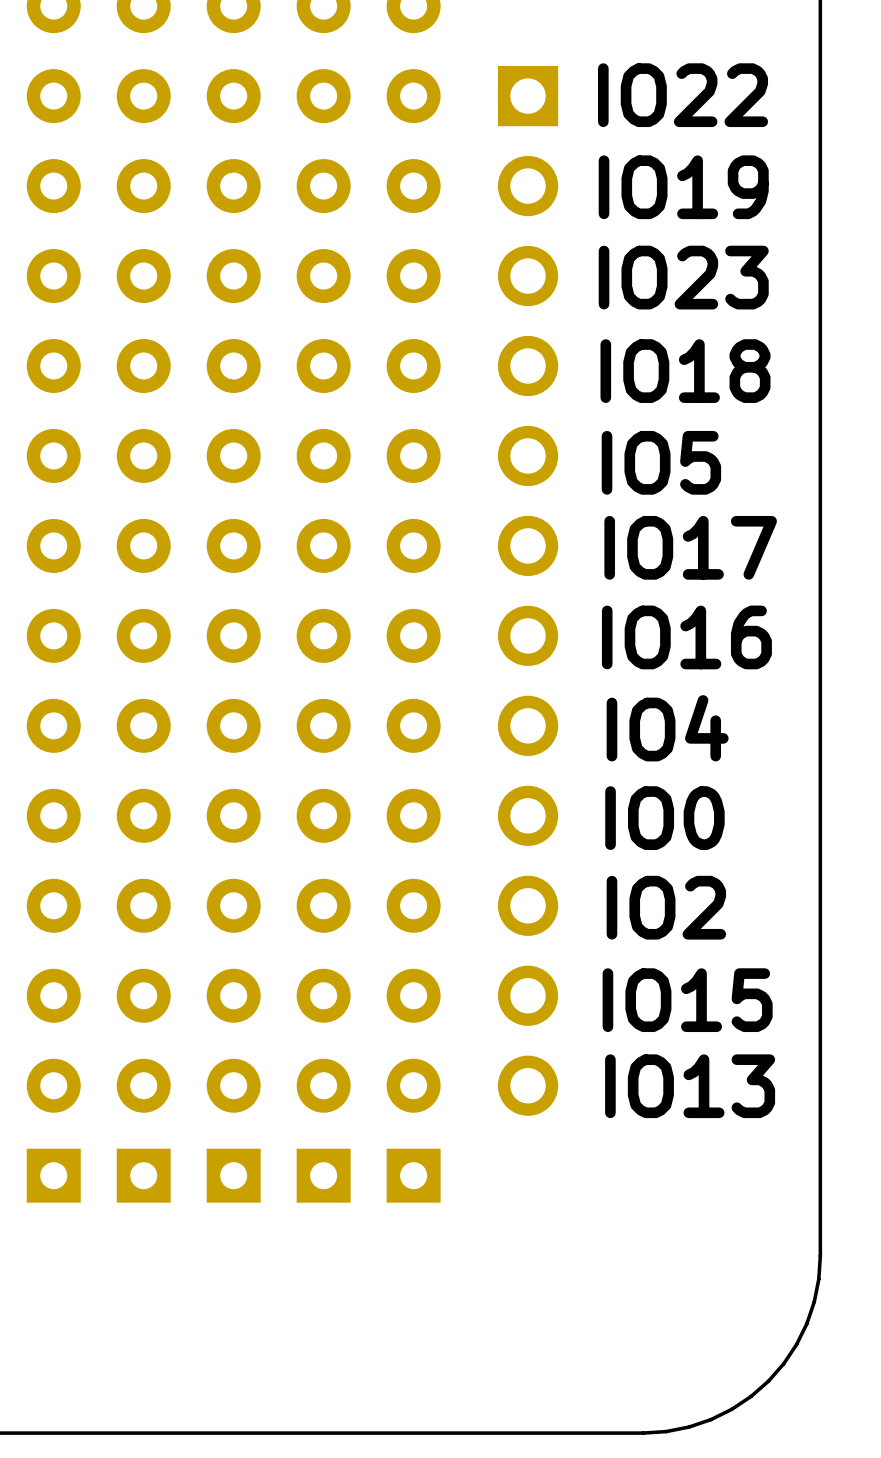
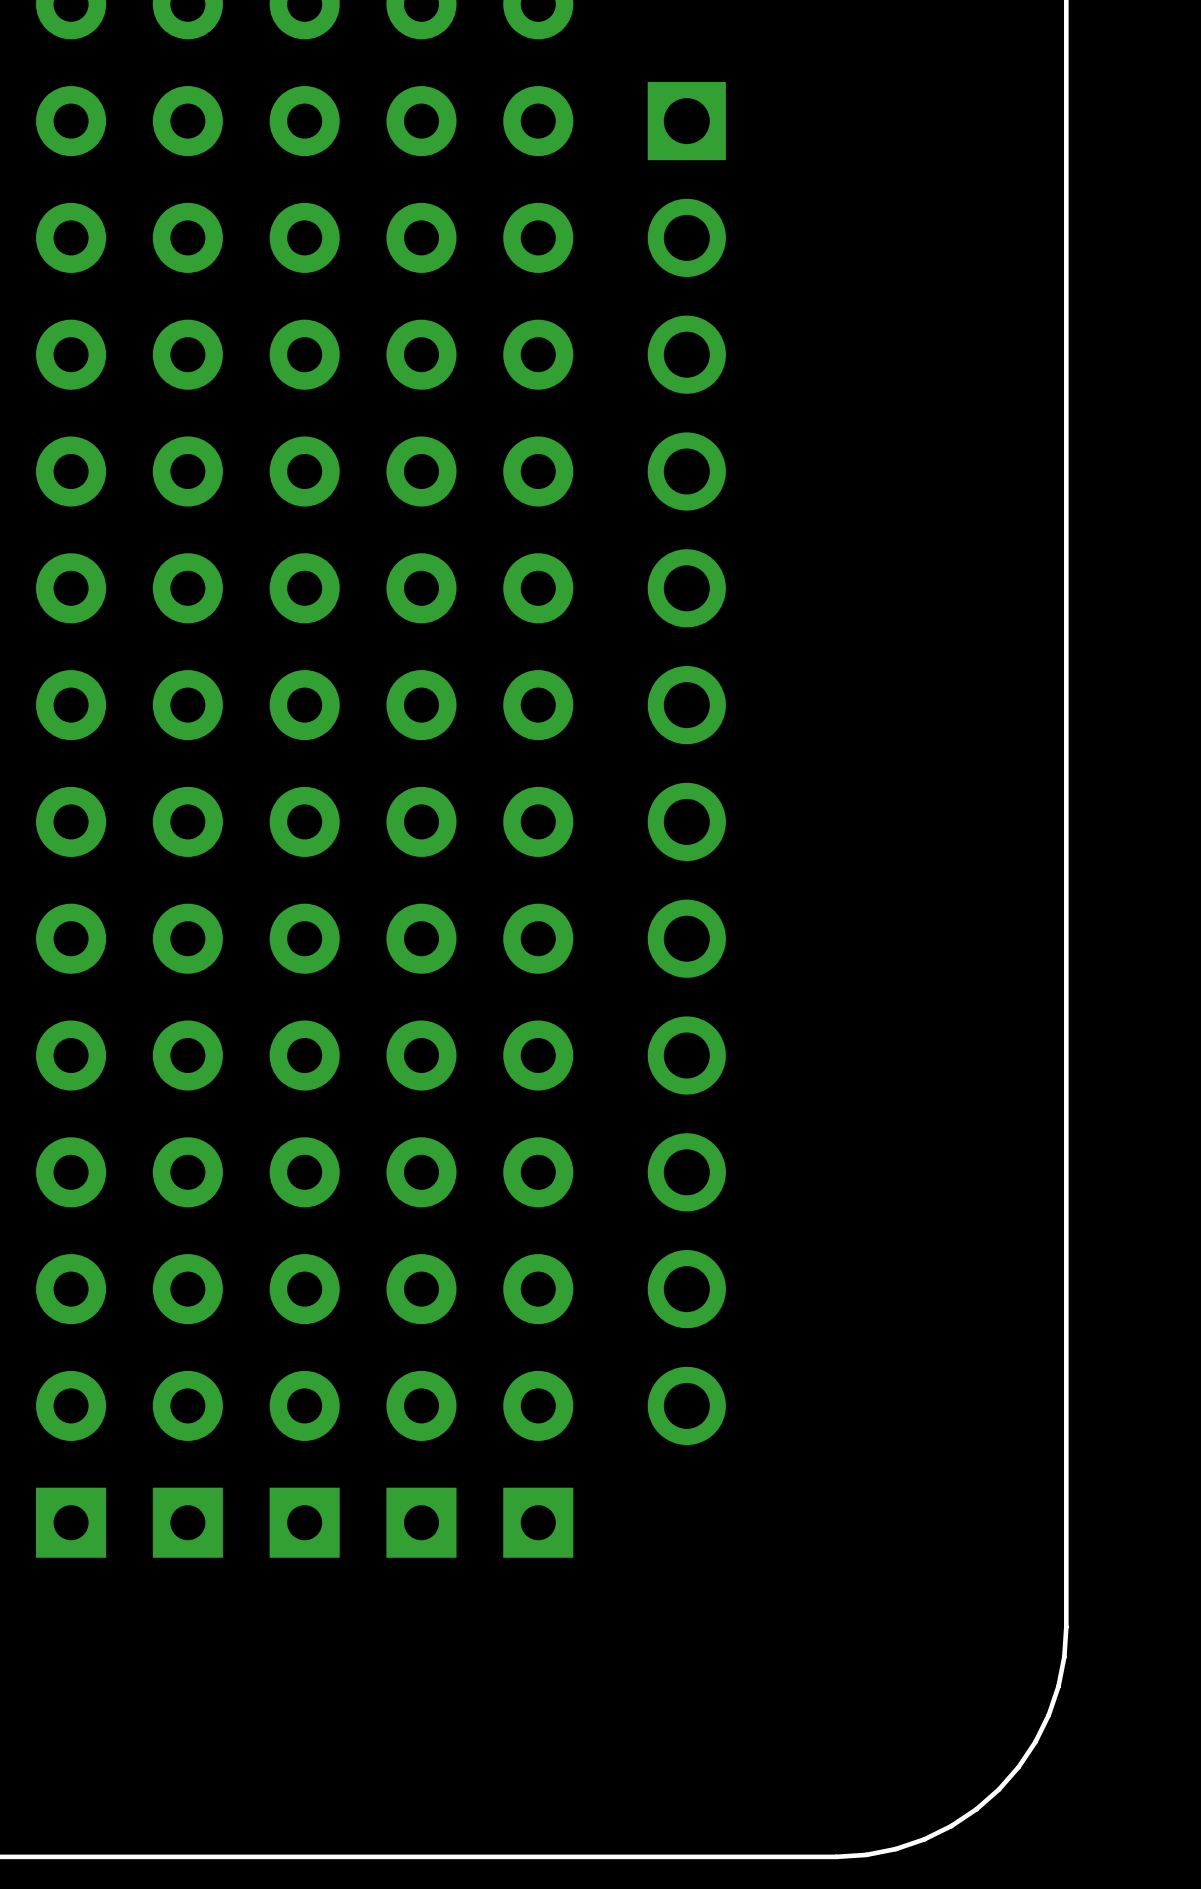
text: IO22 (683, 95) -> none
text: IO19 (683, 187) -> none
text: IO23 (683, 277) -> none
text: IO18 (685, 371) -> none
text: IO5 (661, 462) -> none
text: IO17 (690, 547) -> none
text: IO16 (686, 637) -> none
text: IO4 (667, 728) -> none
text: IO0 (664, 818) -> none
text: IO2 (666, 907) -> none
text: IO15 (687, 1000) -> none
text: IO13 (690, 1086) -> none

